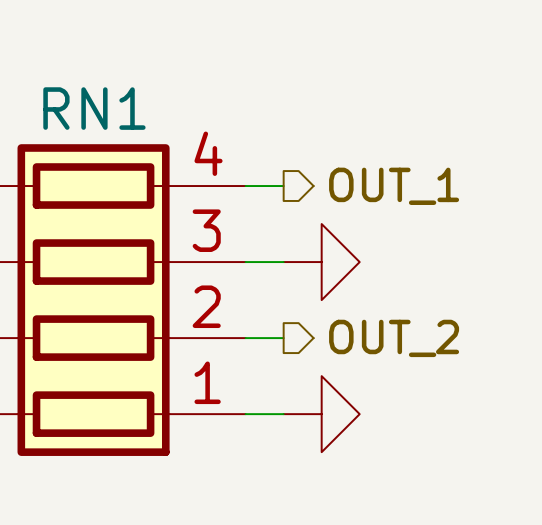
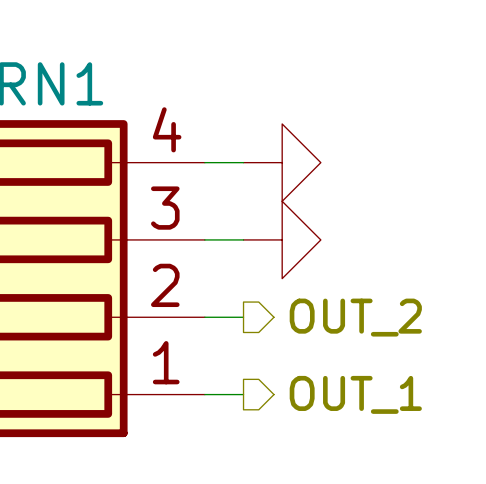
hierarchical label position: OUT_1 (394, 186) -> OUT_1 (355, 394)
power symbol position: (321, 414) -> (282, 162)

